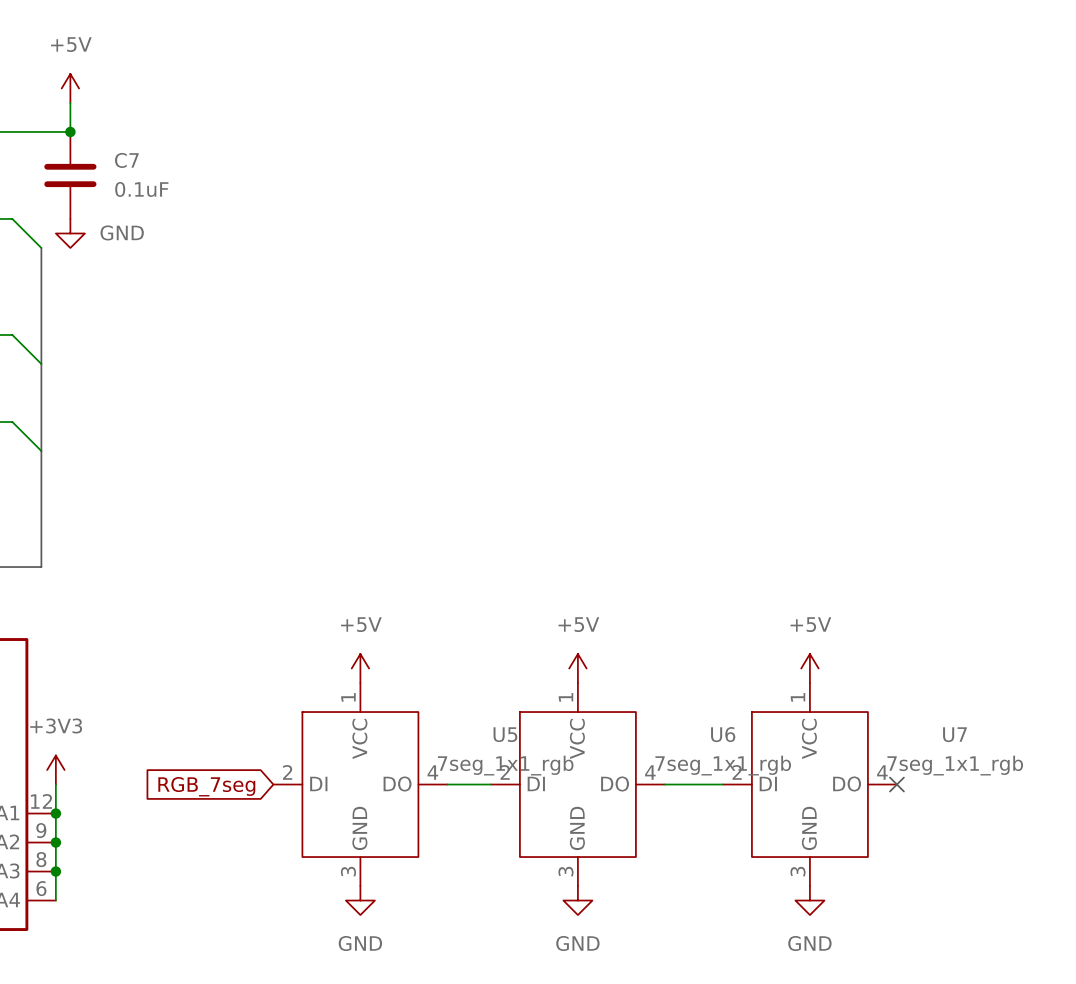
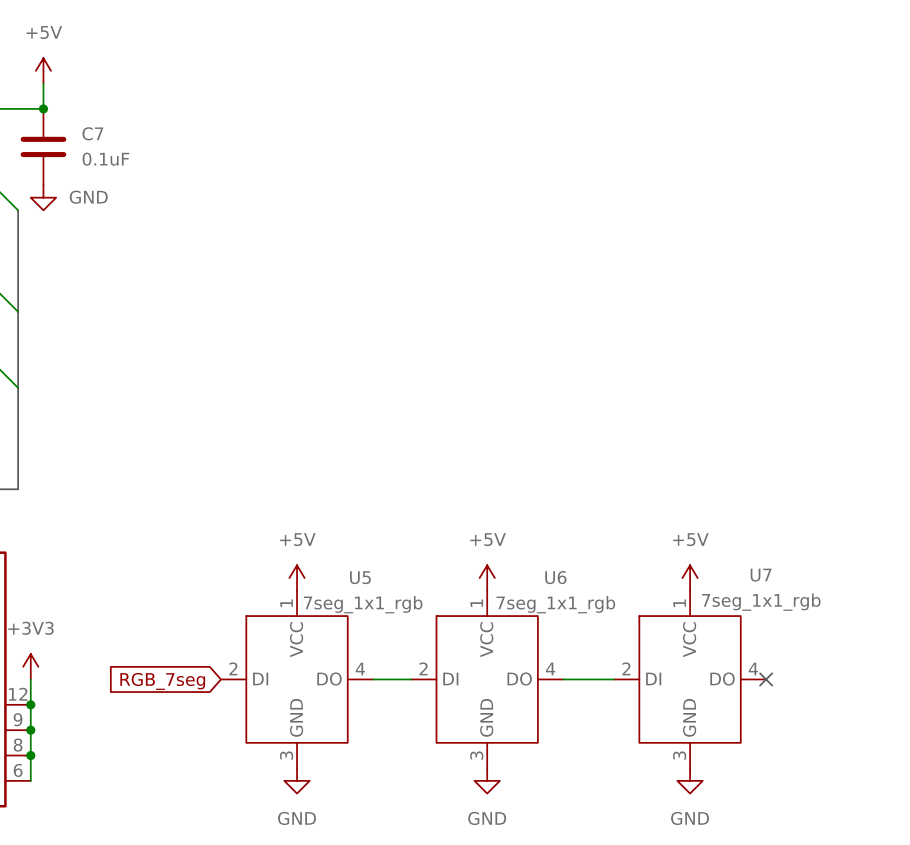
U5 name position: U5 (505, 734) -> U5 (360, 577)
U6 name position: U6 (723, 734) -> U6 (555, 577)
U7 name position: U7 (954, 734) -> U7 (761, 575)
U5 value position: 7seg_1x1_rgb (505, 765) -> 7seg_1x1_rgb (363, 604)
U6 value position: 7seg_1x1_rgb (723, 765) -> 7seg_1x1_rgb (555, 604)
U7 value position: 7seg_1x1_rgb (955, 765) -> 7seg_1x1_rgb (761, 602)

